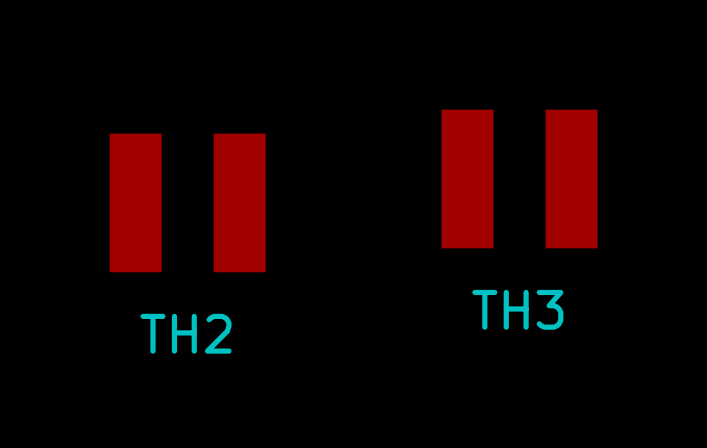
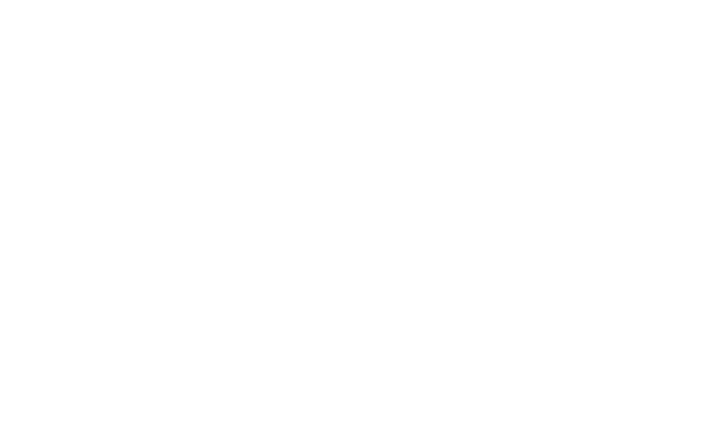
TH3: (519, 178) -> none
TH2: (187, 202) -> none

